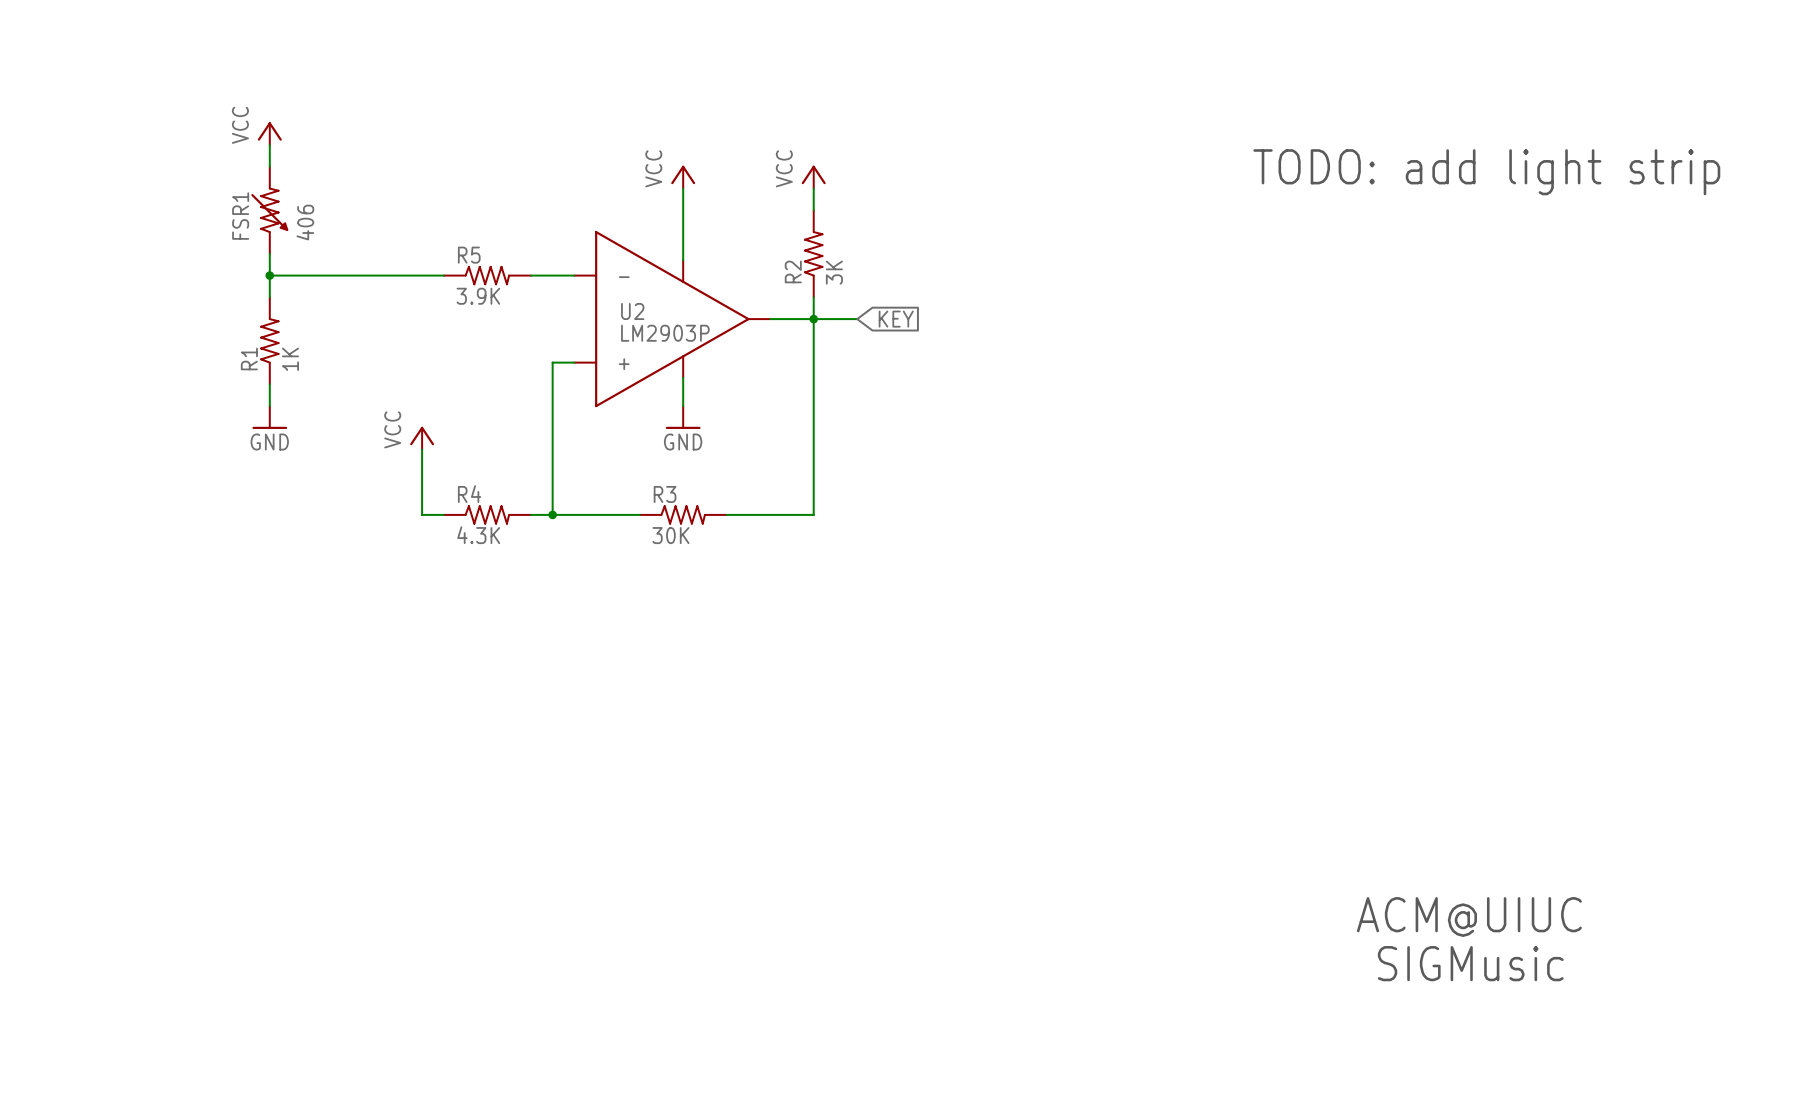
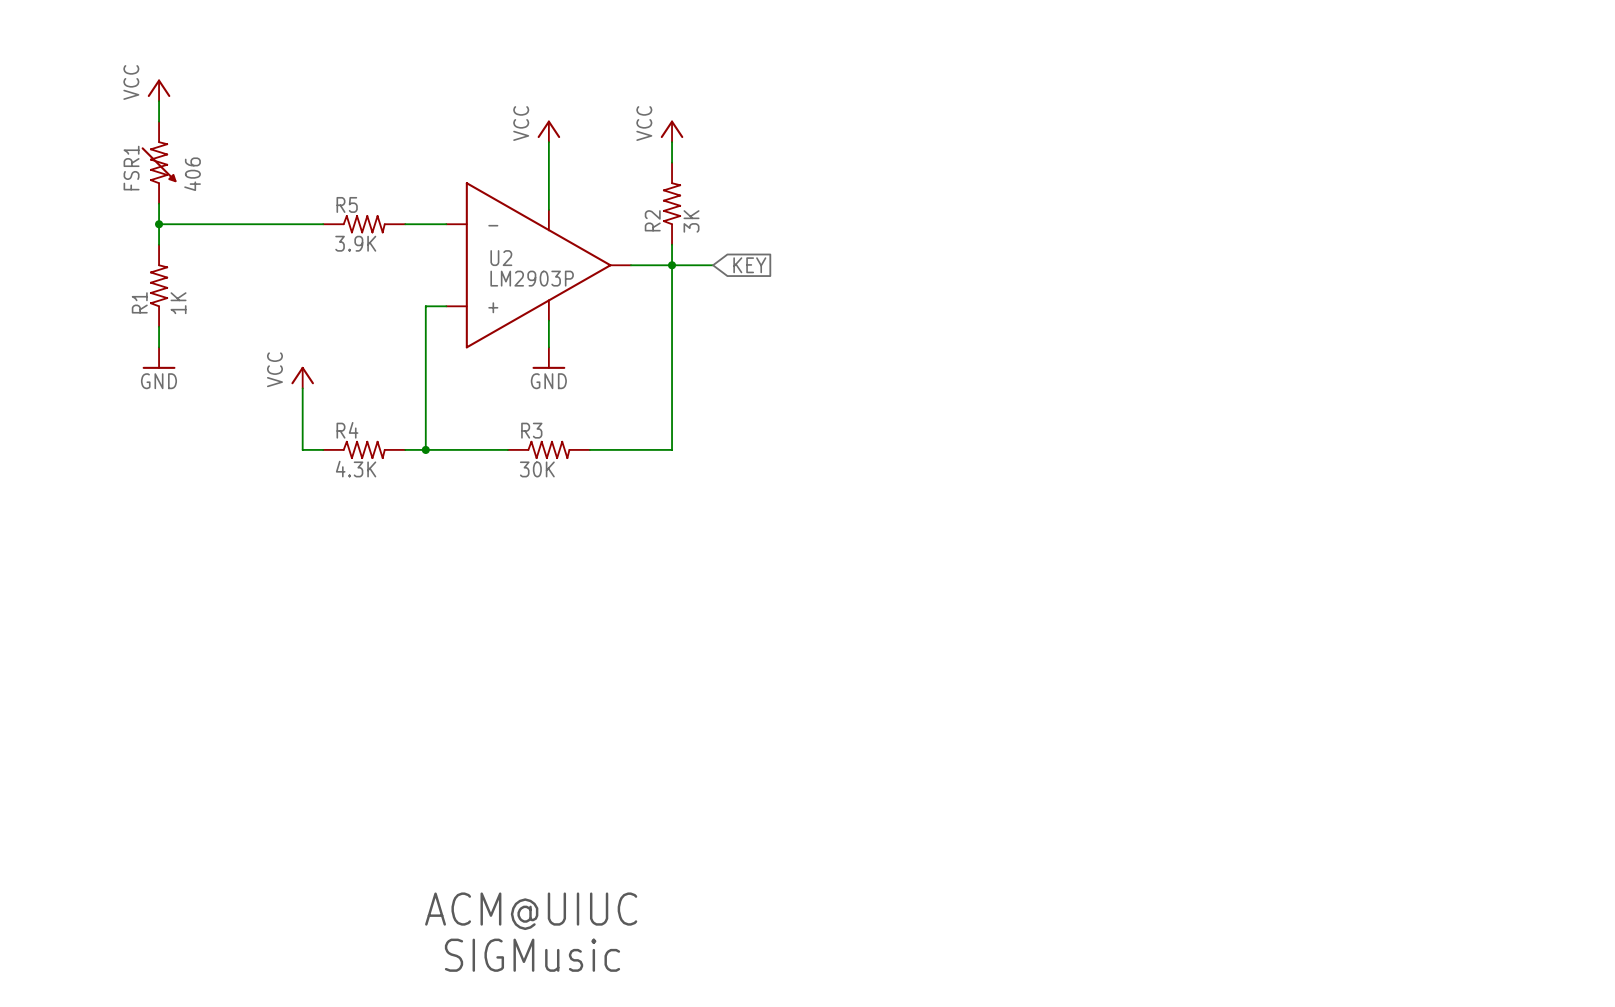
text: TODO: add light strip (1486, 172) -> none
text: ACM@UIUC (1469, 917) -> none
text: SIGMusic (1470, 963) -> none
text: none -> ACM@UIUC (531, 911)
text: none -> SIGMusic (532, 955)

